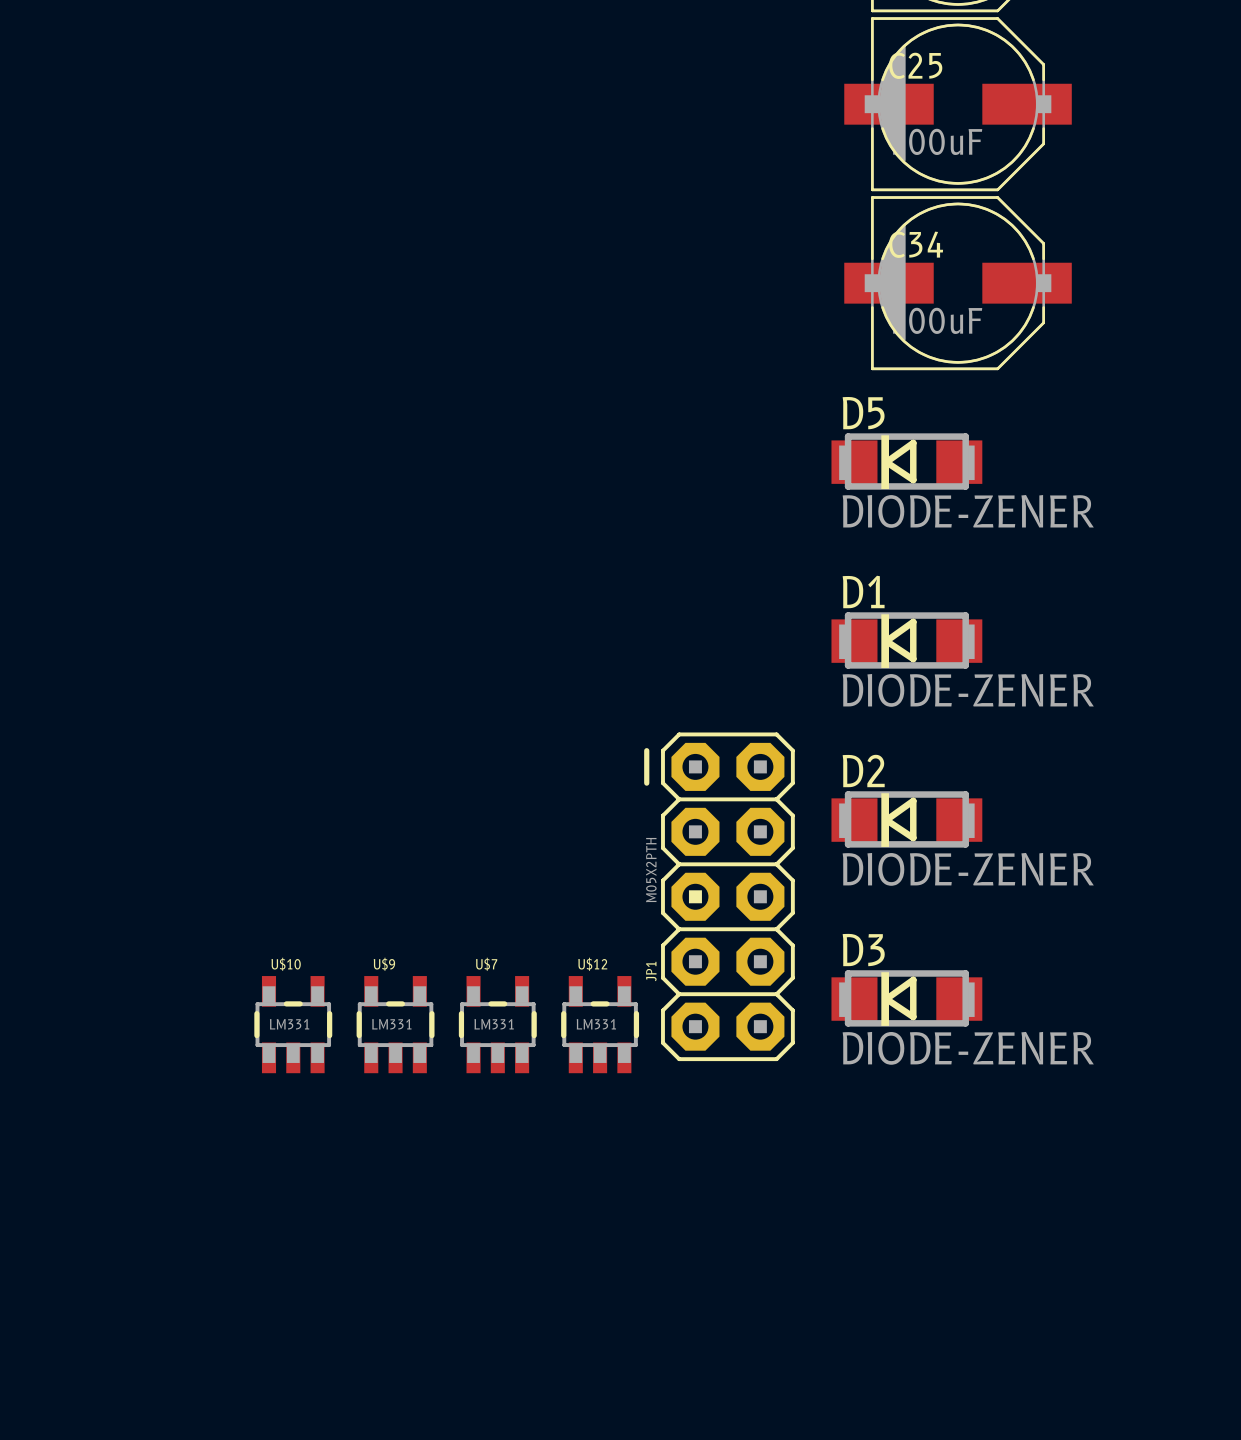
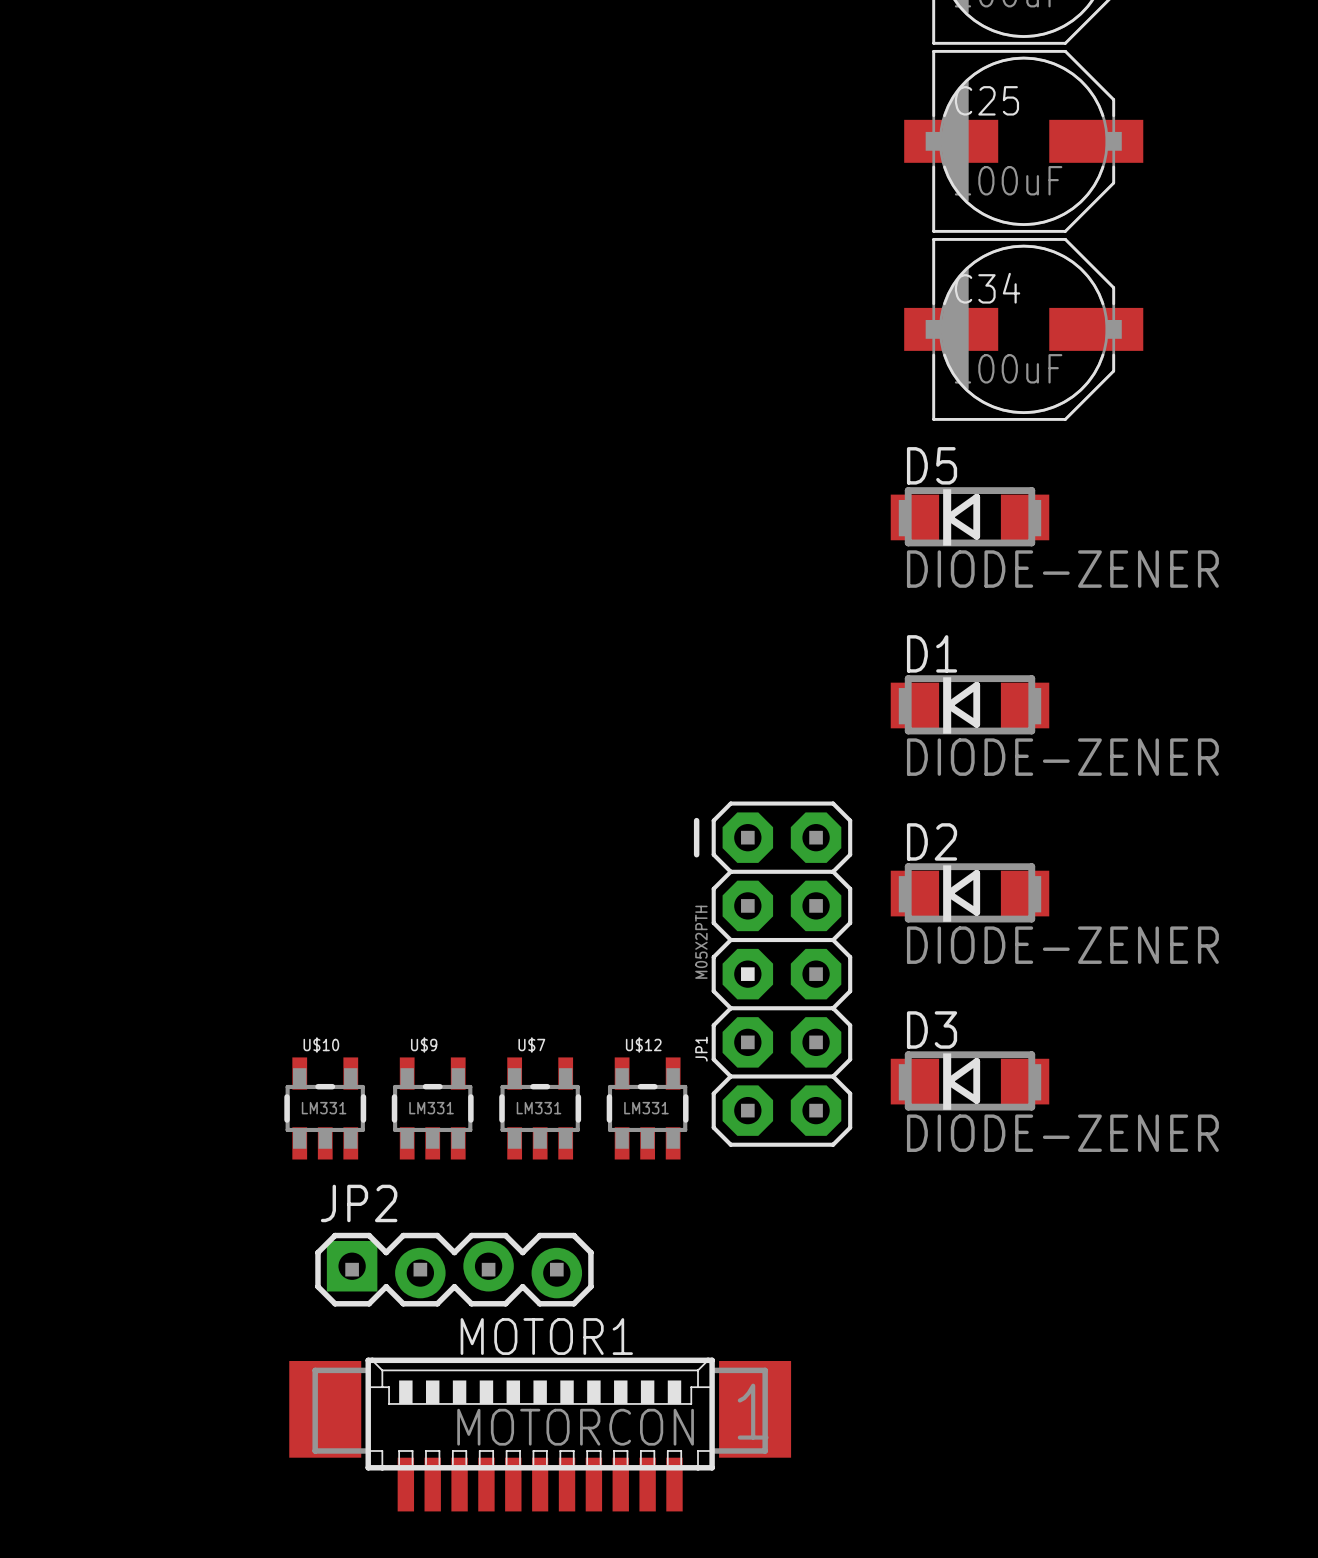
JP2: none -> (454, 1269)
MOTOR1: none -> MOTORCON (540, 1434)

